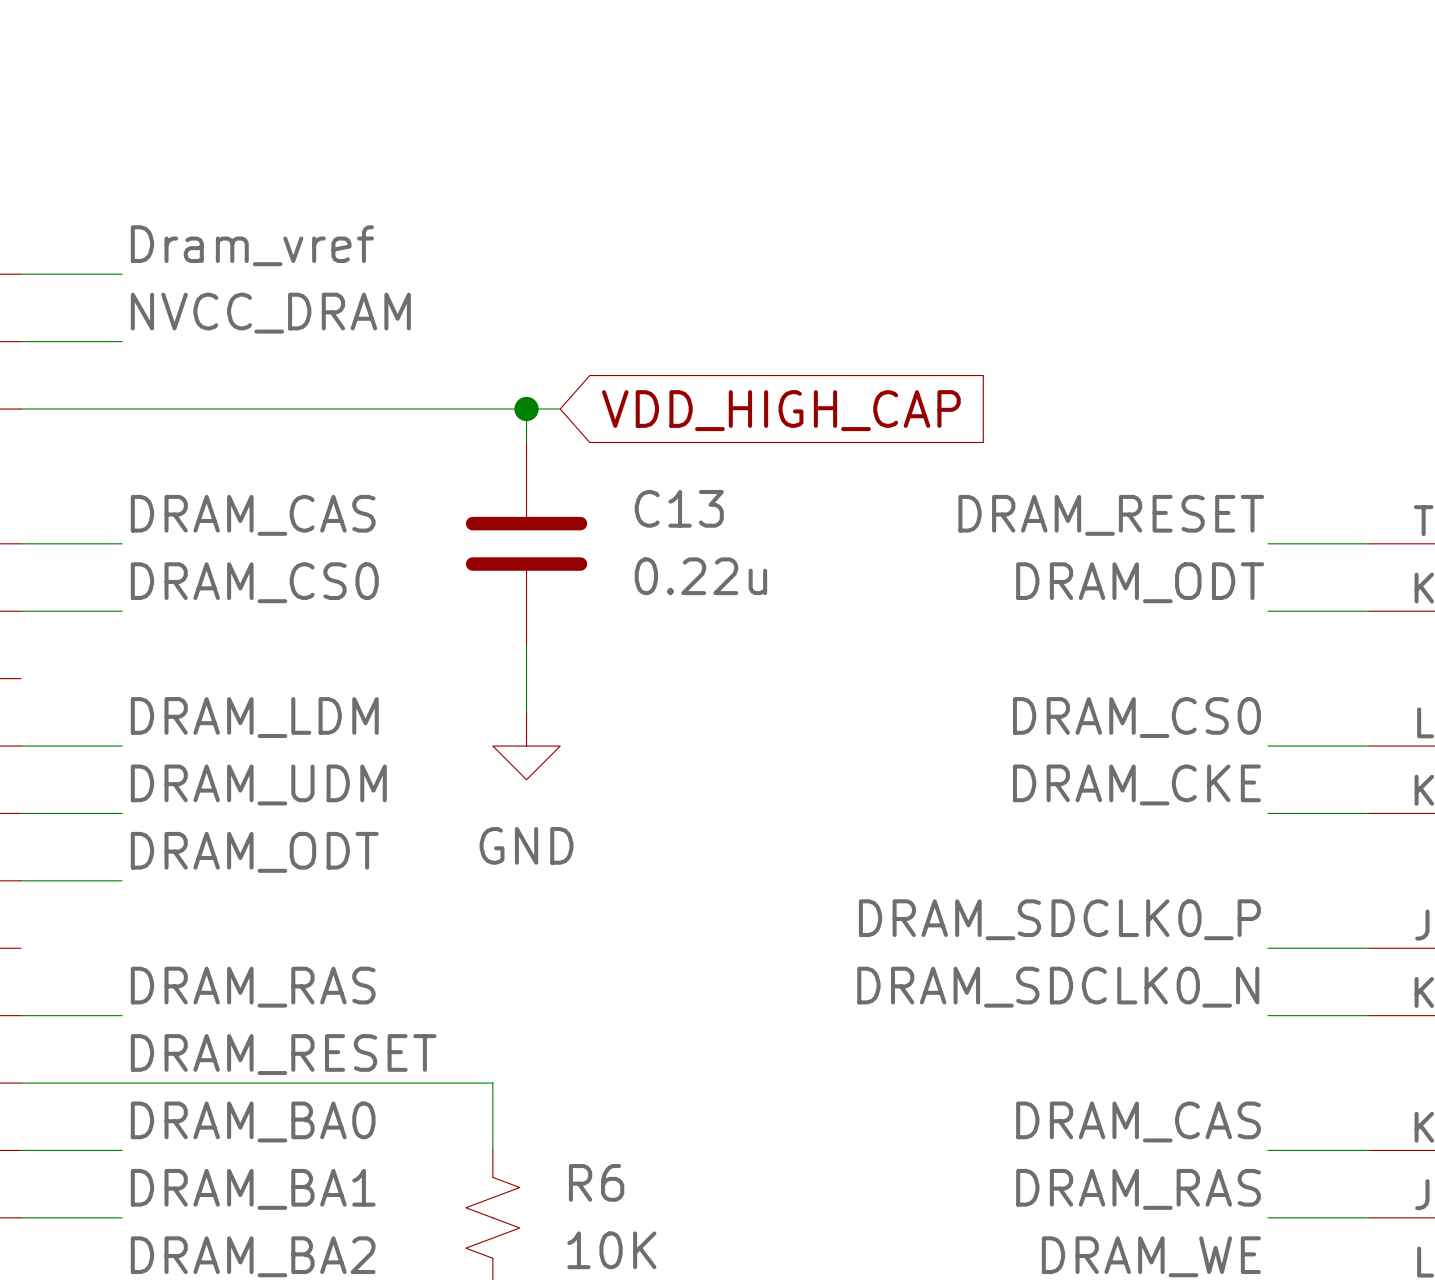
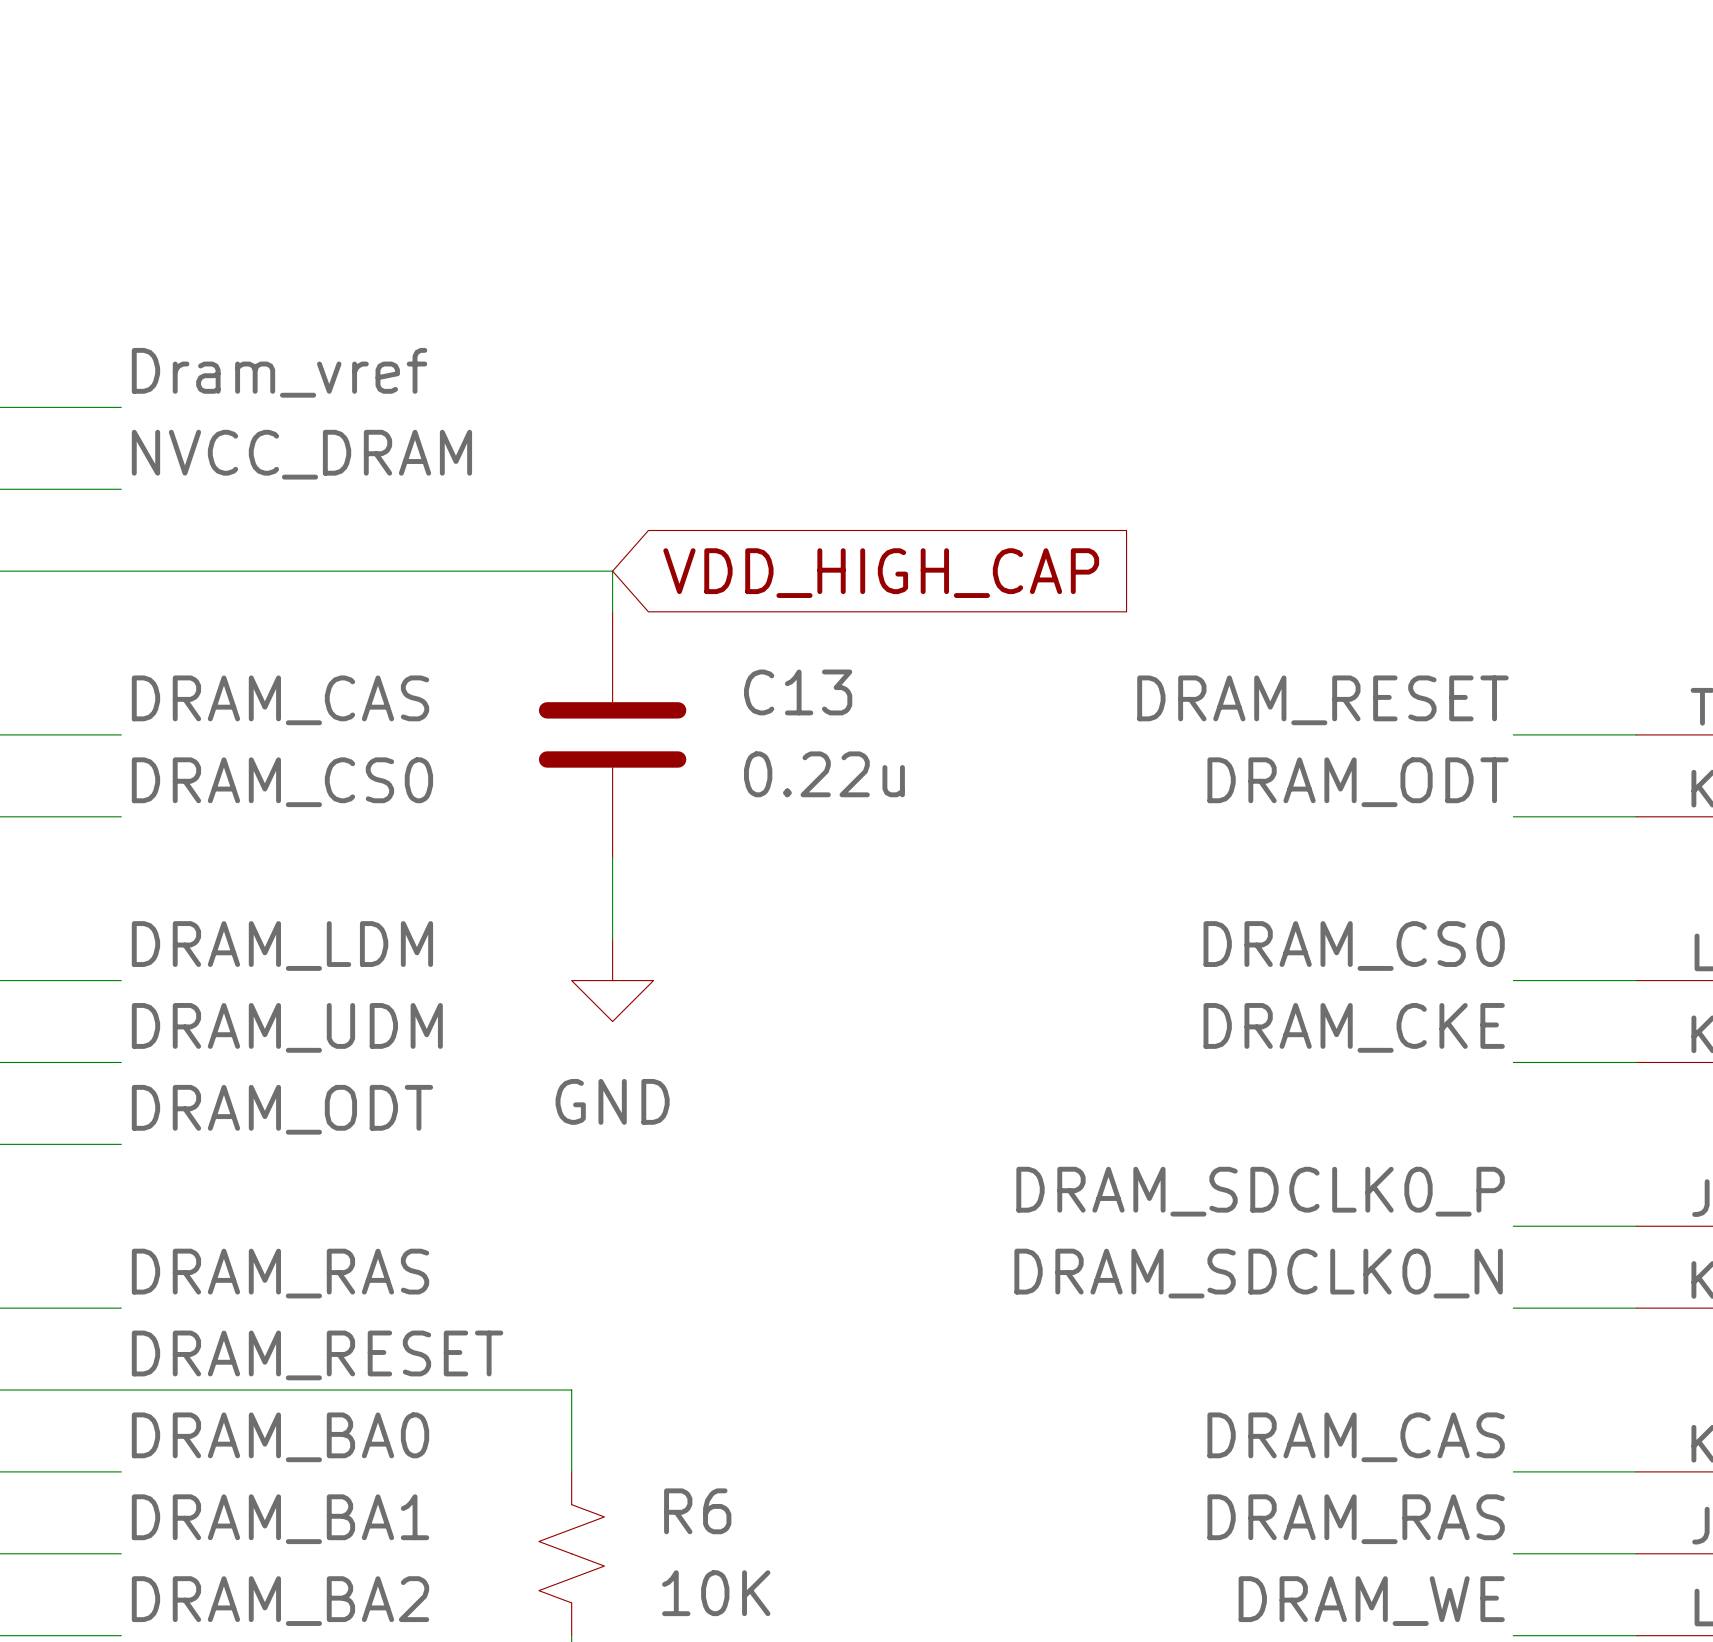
wire: (526, 409) (560, 409) -> none
junction: (526, 409) -> none
global label position: VDD_HIGH_CAP (781, 410) -> VDD_HIGH_CAP (881, 573)

